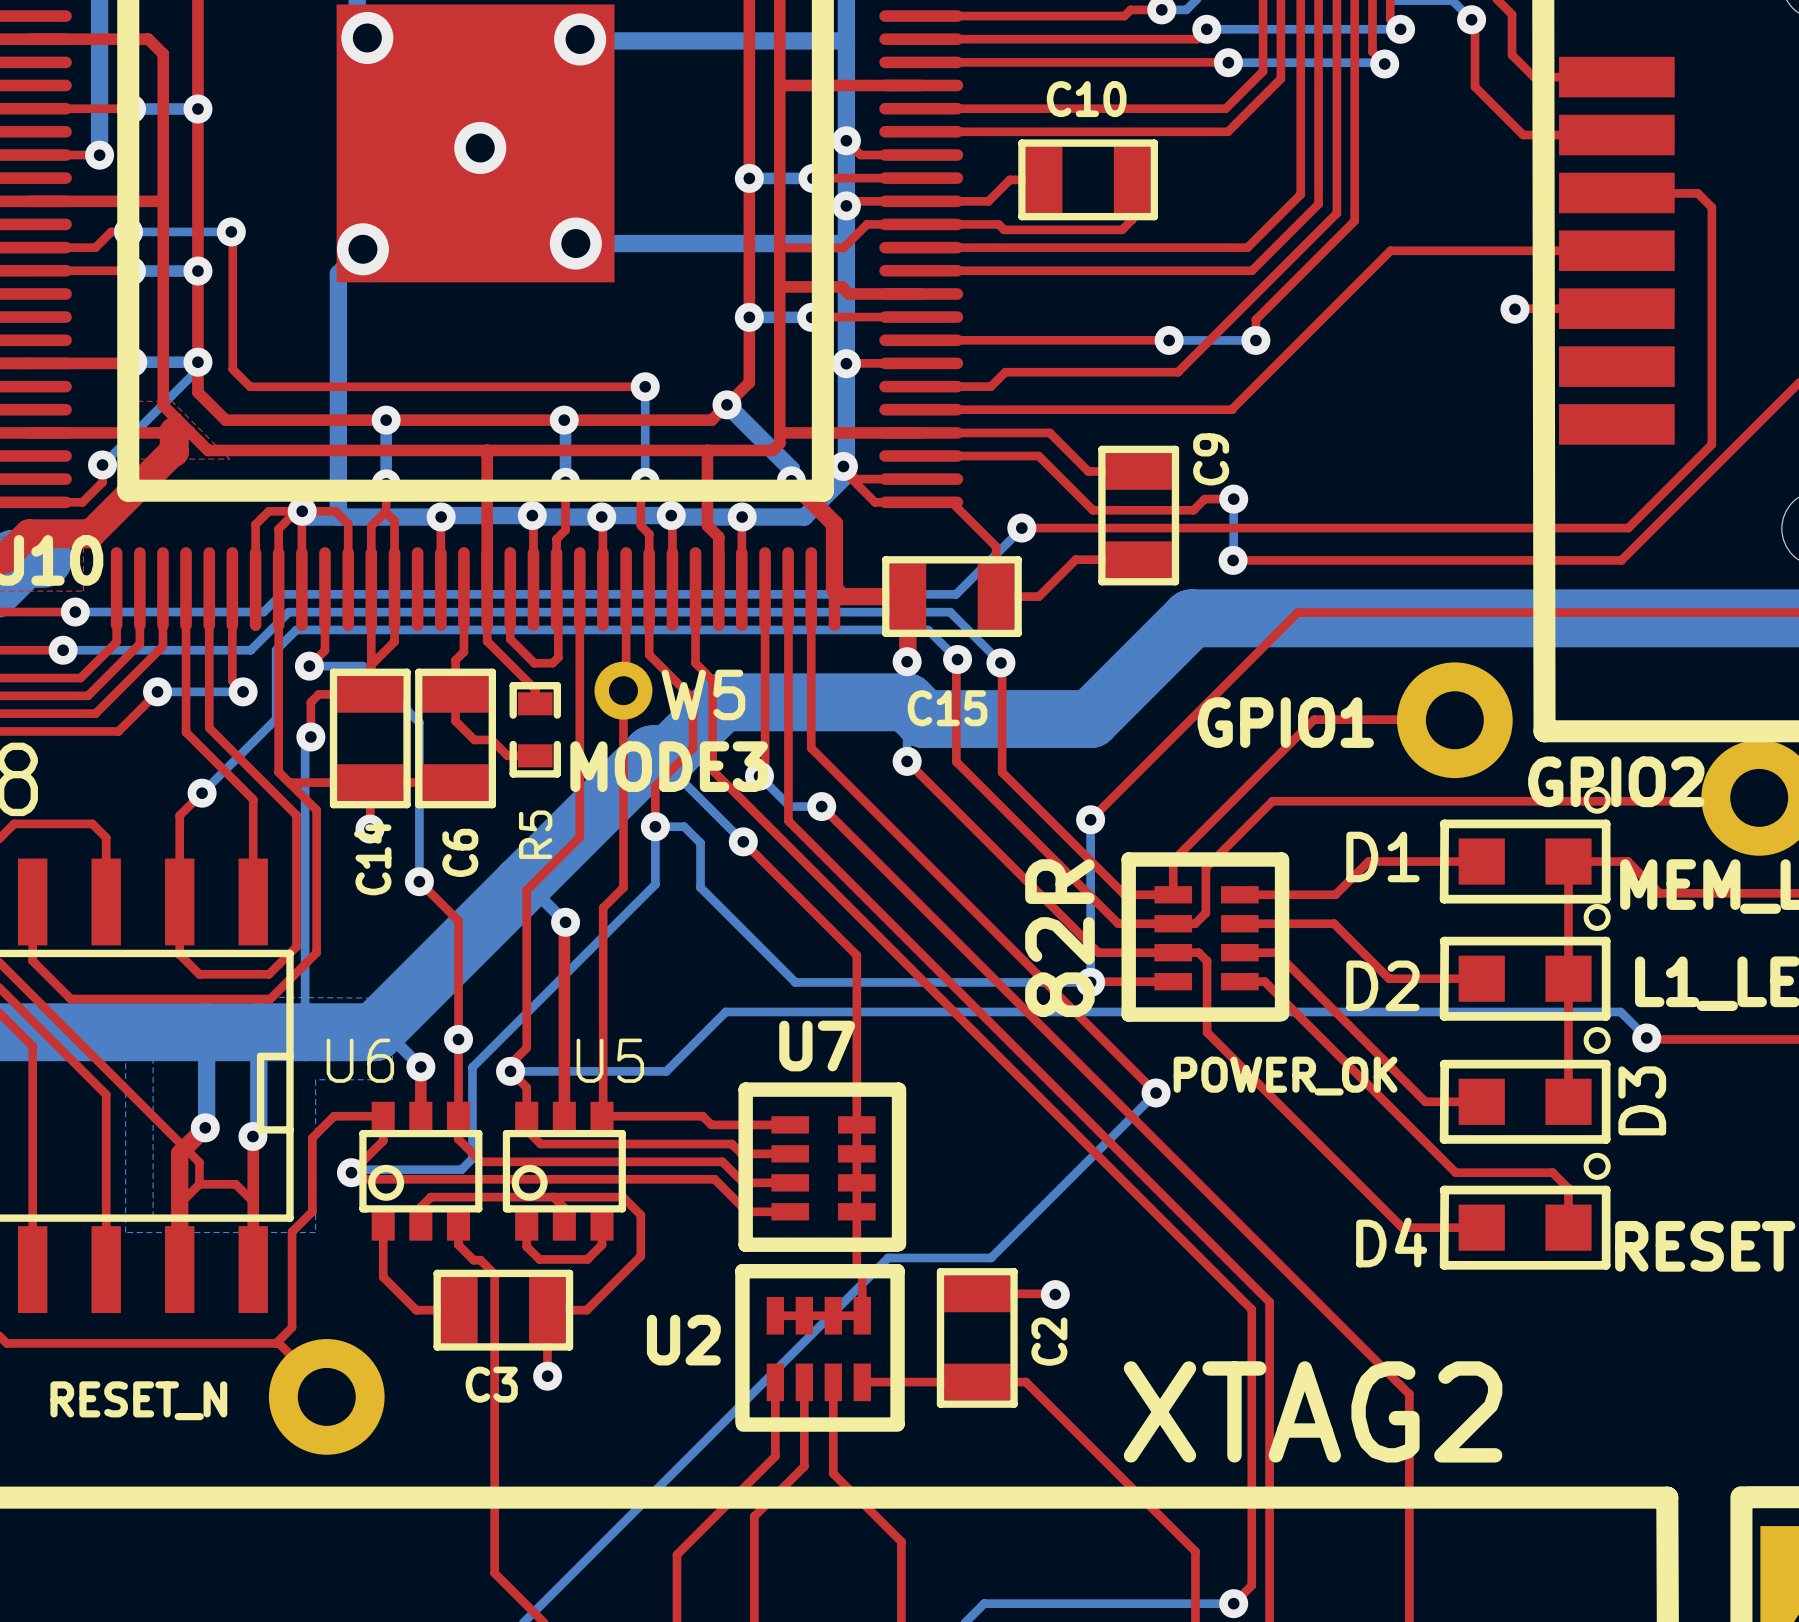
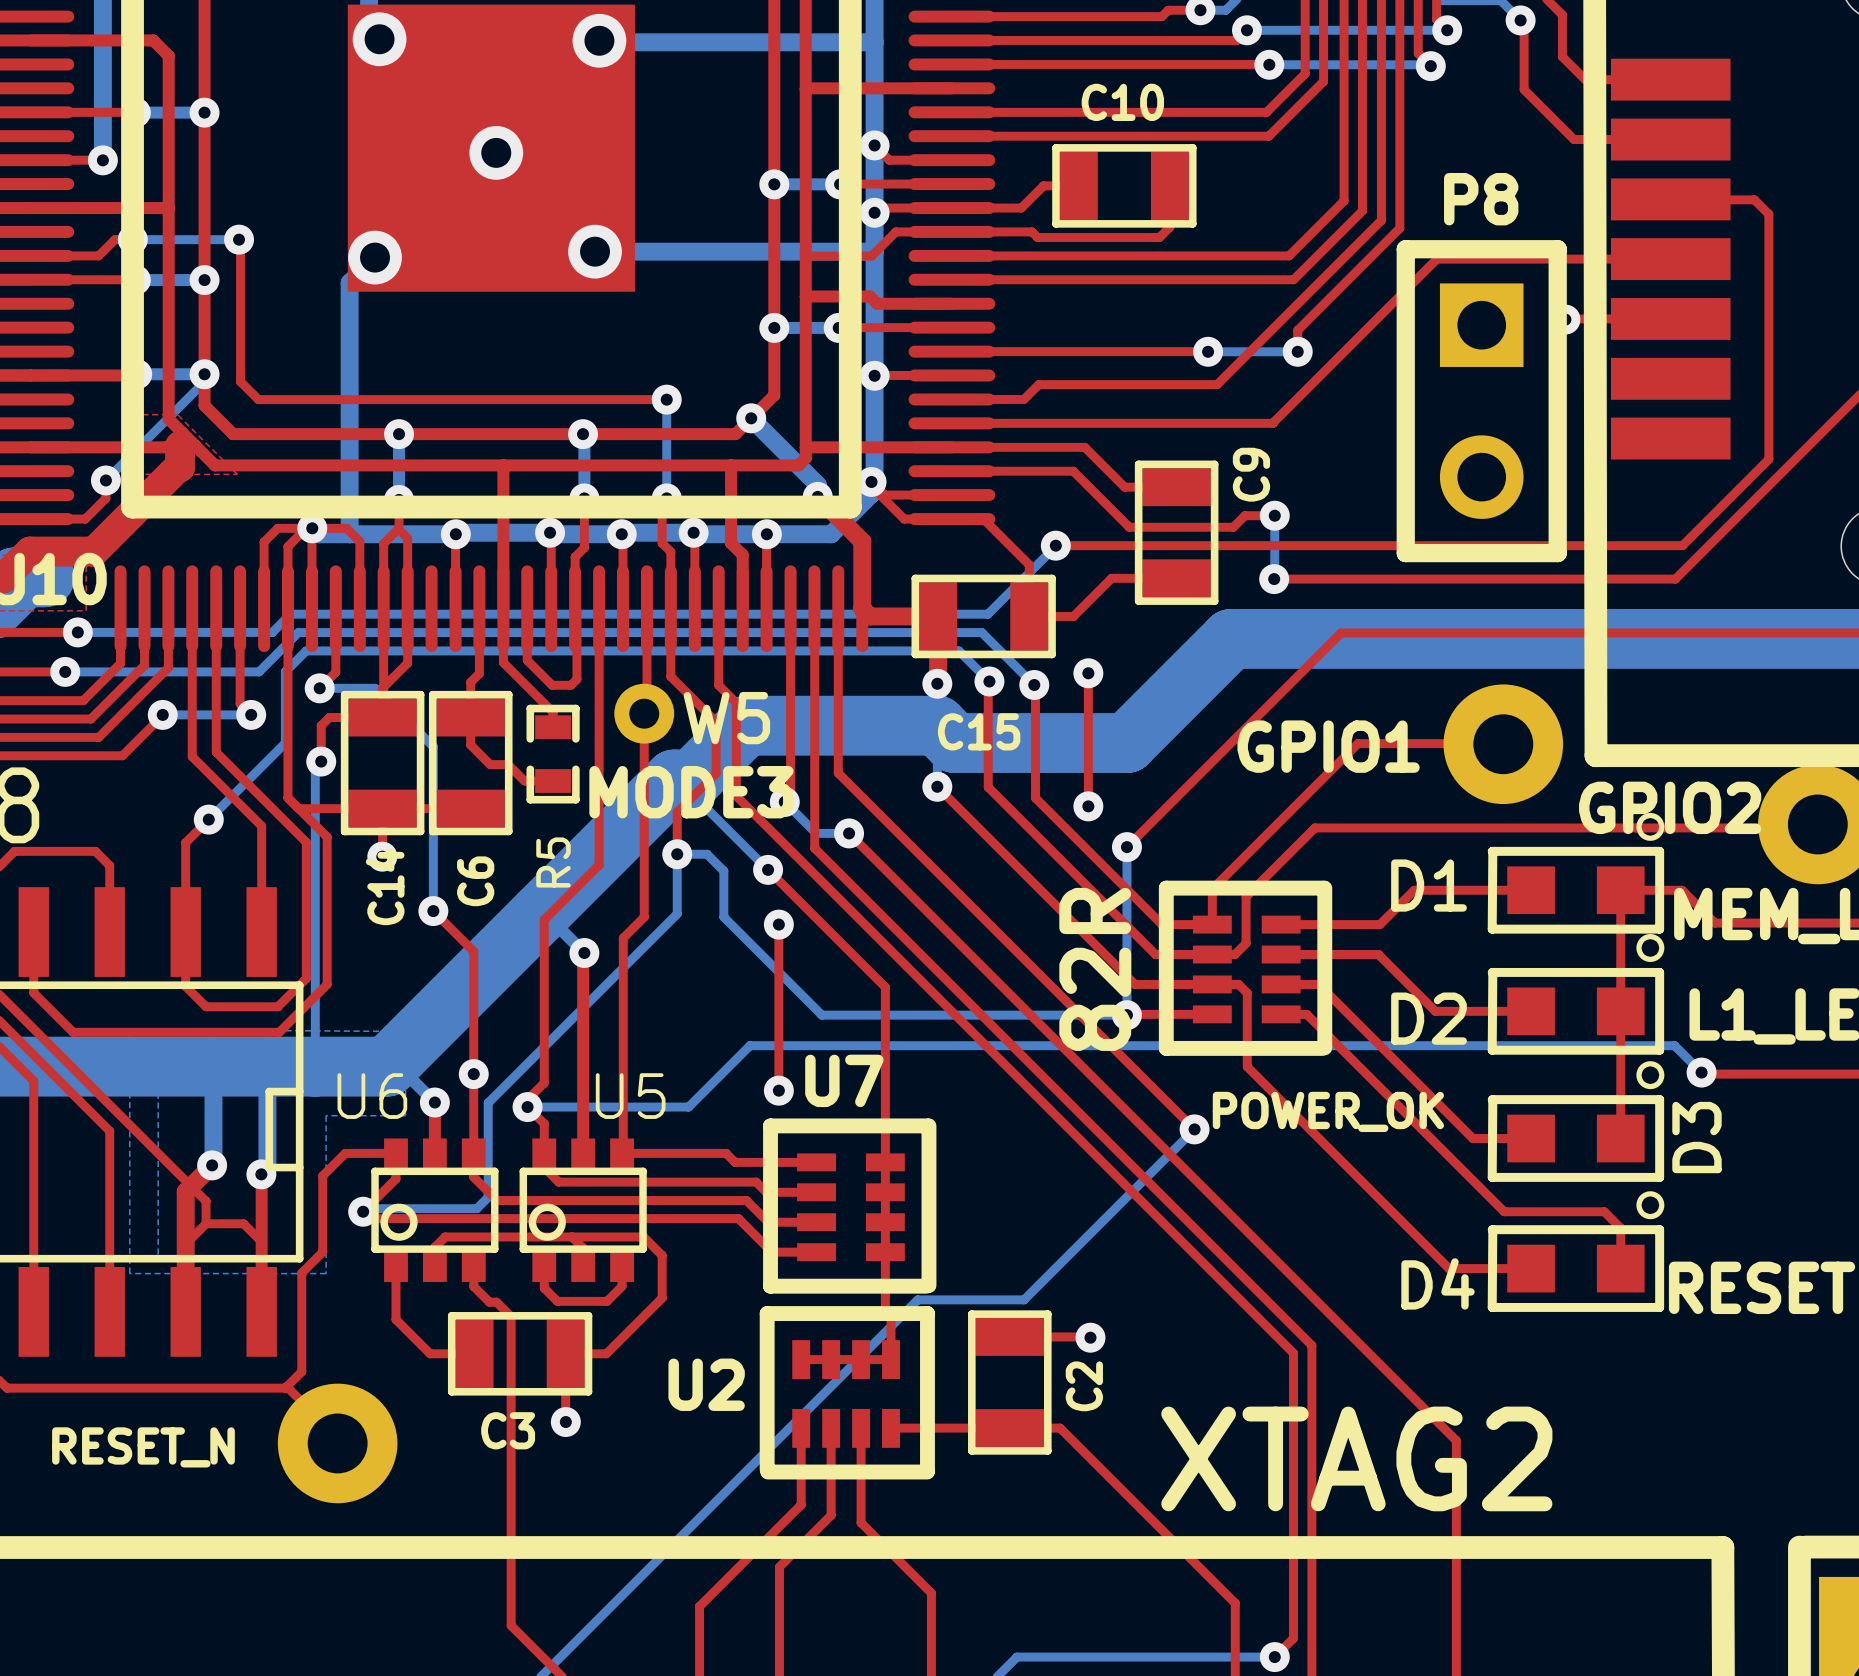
P8: none -> (1481, 401)
top track: none -> (1088, 673) (1088, 806)
via: none -> (1088, 673)
via: none -> (1088, 806)
top track: none -> (778, 924) (778, 1090)
via: none -> (778, 924)
via: none -> (778, 1090)

